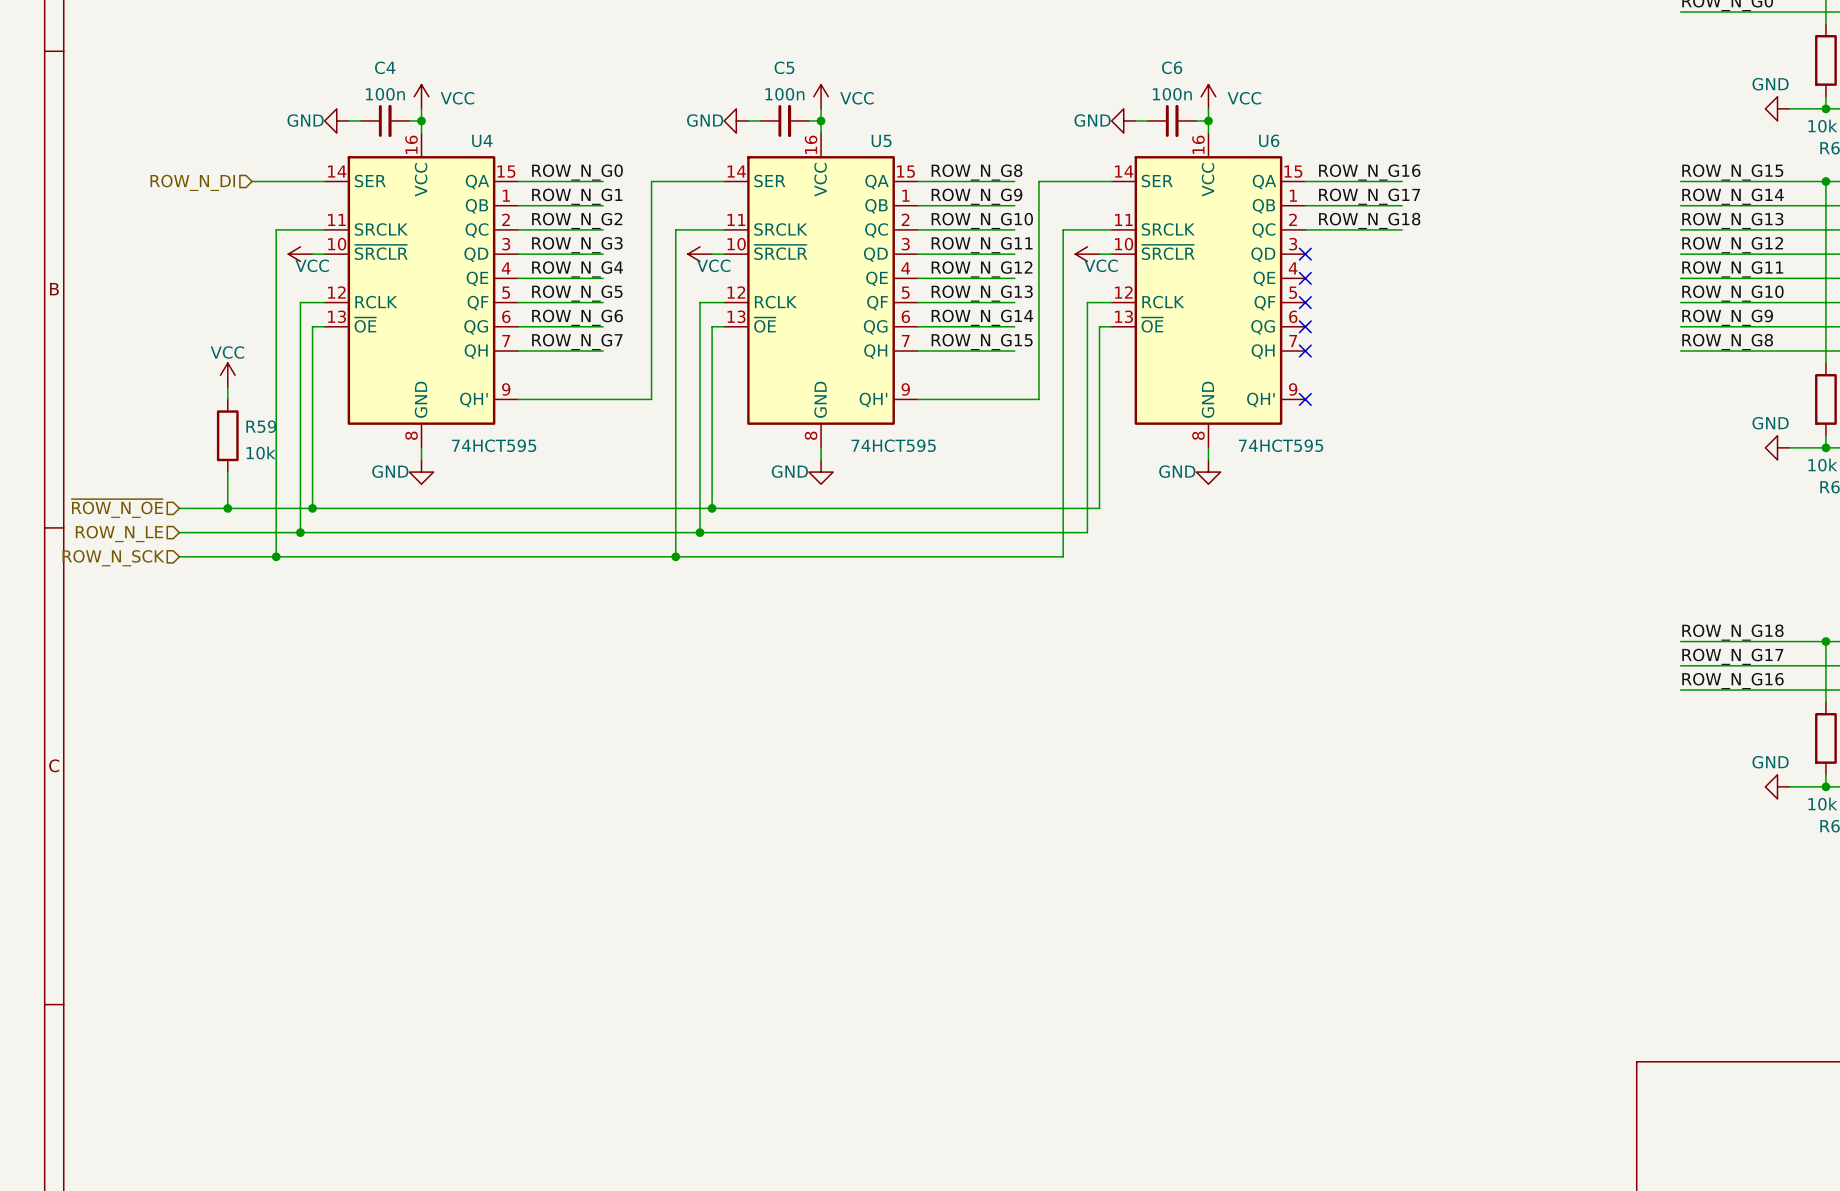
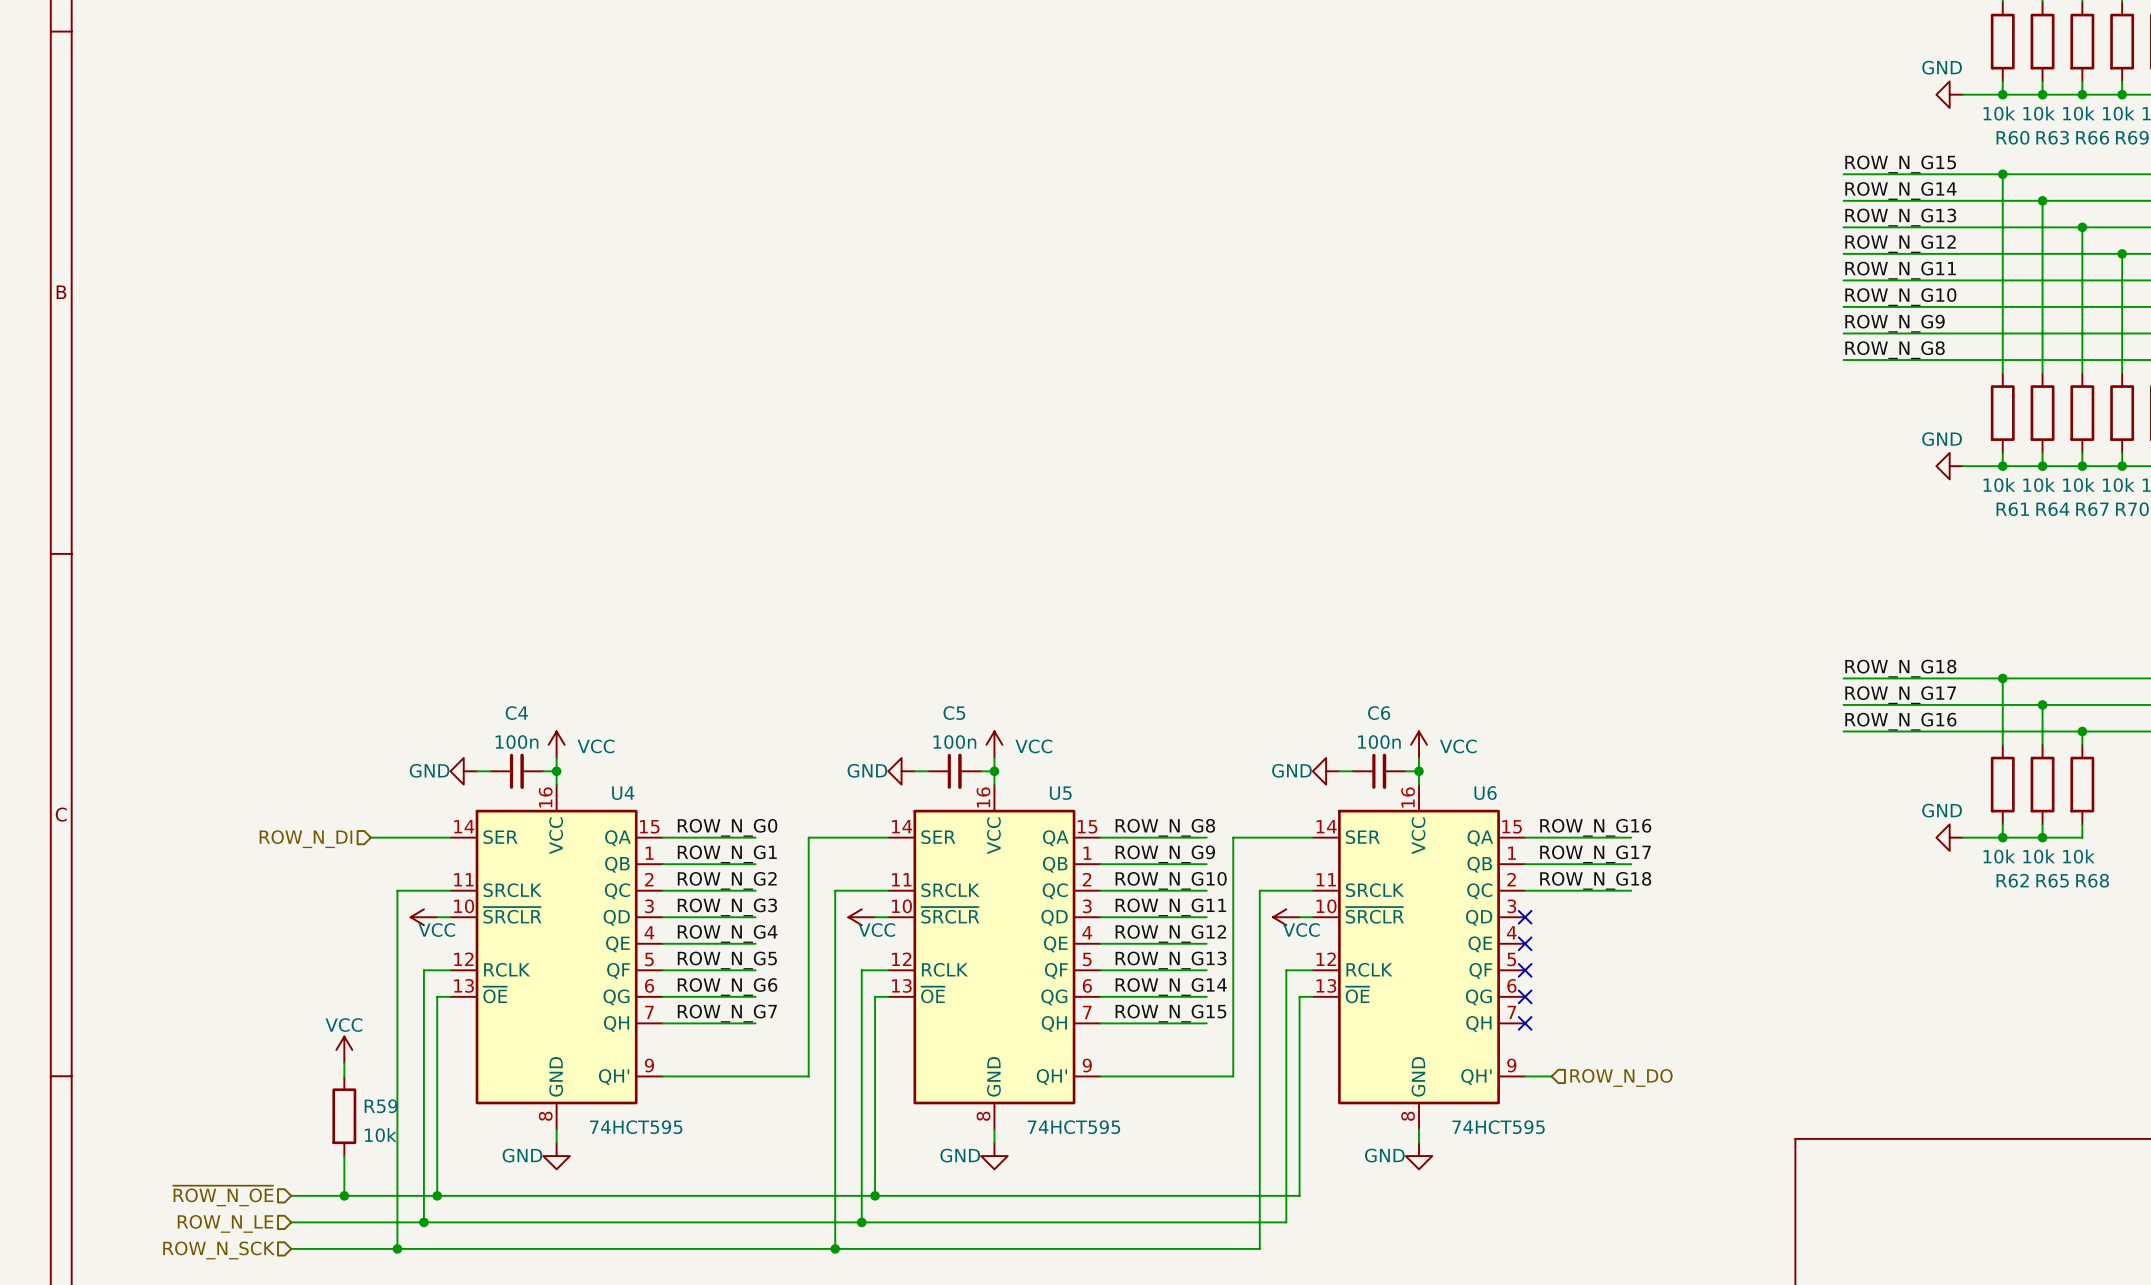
power symbol: VCC (421, 96) -> none
power symbol: VCC (821, 96) -> none
power symbol: VCC (1208, 96) -> none
wire: (421, 108) (421, 133) -> none
wire: (821, 108) (821, 133) -> none
wire: (1208, 108) (1208, 133) -> none
power symbol: GND (336, 120) -> none
wire: (348, 120) (360, 120) -> none
C4 position: (385, 120) -> (516, 771)
wire: (409, 120) (421, 120) -> none
junction: (421, 120) -> none
power symbol: GND (736, 120) -> none
wire: (748, 120) (760, 120) -> none
C5 position: (784, 120) -> (954, 771)
wire: (808, 120) (821, 120) -> none
junction: (821, 120) -> none
power symbol: GND (1123, 120) -> none
wire: (1135, 120) (1147, 120) -> none
C6 position: (1172, 120) -> (1379, 771)
wire: (1196, 120) (1208, 120) -> none
junction: (1208, 120) -> none
label: ROW_N_G0 (577, 172) -> none
label: ROW_N_G8 (977, 172) -> none
label: ROW_N_G16 (1369, 172) -> none
wire: (252, 181) (324, 181) -> none
wire: (518, 181) (603, 181) -> none
wire: (724, 181) (651, 181) (651, 399) (518, 399) -> none
wire: (917, 181) (1014, 181) -> none
wire: (1111, 181) (1038, 181) (1038, 399) (917, 399) -> none
wire: (1305, 181) (1402, 181) -> none
hierarchical label: ROW_N_DI (192, 182) -> none
label: ROW_N_G1 (577, 196) -> none
label: ROW_N_G9 (976, 196) -> none
label: ROW_N_G17 (1369, 196) -> none
wire: (518, 205) (603, 205) -> none
wire: (917, 205) (1014, 205) -> none
wire: (1305, 205) (1402, 205) -> none
label: ROW_N_G2 (577, 220) -> none
label: ROW_N_G10 (982, 220) -> none
label: ROW_N_G18 (1369, 220) -> none
wire: (324, 229) (276, 229) (276, 556) -> none
wire: (518, 229) (603, 229) -> none
wire: (724, 229) (675, 229) (675, 556) -> none
wire: (917, 229) (1014, 229) -> none
wire: (1111, 229) (1063, 229) (1063, 556) (179, 556) -> none
wire: (1305, 229) (1402, 229) -> none
label: ROW_N_G3 (577, 245) -> none
label: ROW_N_G11 (982, 245) -> none
power symbol: VCC (300, 254) -> none
wire: (312, 254) (324, 254) -> none
wire: (518, 254) (603, 254) -> none
power symbol: VCC (699, 254) -> none
wire: (712, 254) (724, 254) -> none
wire: (917, 254) (1014, 254) -> none
power symbol: VCC (1087, 254) -> none
wire: (1099, 254) (1111, 254) -> none
no-connect mark: (1305, 254) -> none
label: ROW_N_G4 (577, 269) -> none
label: ROW_N_G12 (982, 269) -> none
wire: (518, 278) (603, 278) -> none
wire: (917, 278) (1014, 278) -> none
no-connect mark: (1305, 278) -> none
U4 position: (421, 290) -> (556, 957)
U5 position: (821, 290) -> (994, 957)
U6 position: (1208, 290) -> (1418, 957)
label: ROW_N_G5 (577, 293) -> none
label: ROW_N_G13 (982, 293) -> none
wire: (324, 302) (300, 302) (300, 532) -> none
wire: (518, 302) (603, 302) -> none
wire: (724, 302) (699, 302) (699, 532) -> none
wire: (917, 302) (1014, 302) -> none
wire: (1111, 302) (1087, 302) (1087, 532) (179, 532) -> none
no-connect mark: (1305, 302) -> none
label: ROW_N_G6 (577, 317) -> none
label: ROW_N_G14 (982, 317) -> none
wire: (324, 326) (312, 326) (312, 508) -> none
wire: (518, 326) (603, 326) -> none
wire: (724, 326) (712, 326) (712, 508) -> none
wire: (917, 326) (1014, 326) -> none
wire: (1111, 326) (1099, 326) (1099, 508) (179, 508) -> none
no-connect mark: (1305, 326) -> none
label: ROW_N_G7 (577, 342) -> none
label: ROW_N_G15 (982, 342) -> none
wire: (518, 351) (603, 351) -> none
wire: (917, 351) (1014, 351) -> none
no-connect mark: (1305, 351) -> none
power symbol: VCC (227, 375) -> none
wire: (227, 387) (227, 399) -> none
no-connect mark: (1305, 399) -> none
R59 position: (227, 435) -> (344, 1116)
wire: (421, 447) (421, 459) -> none
wire: (821, 447) (821, 459) -> none
wire: (1208, 447) (1208, 459) -> none
wire: (227, 472) (227, 508) -> none
power symbol: GND (421, 472) -> none
power symbol: GND (821, 472) -> none
power symbol: GND (1208, 472) -> none
hierarchical label: ~{ROW_N_OE} (117, 508) -> none
junction: (227, 508) -> none
junction: (312, 508) -> none
junction: (712, 508) -> none
junction: (300, 532) -> none
junction: (699, 532) -> none
hierarchical label: ROW_N_LE (119, 534) -> none
junction: (276, 556) -> none
junction: (675, 556) -> none
hierarchical label: ROW_N_SCK (113, 558) -> none
power symbol: none -> VCC (556, 744)
power symbol: none -> VCC (994, 744)
power symbol: none -> VCC (1418, 744)
wire: none -> (556, 758) (556, 784)
wire: none -> (994, 758) (994, 784)
wire: none -> (1418, 758) (1418, 784)
power symbol: none -> GND (463, 771)
wire: none -> (477, 771) (490, 771)
wire: none -> (543, 771) (556, 771)
junction: none -> (556, 771)
power symbol: none -> GND (901, 771)
wire: none -> (914, 771) (928, 771)
wire: none -> (981, 771) (994, 771)
junction: none -> (994, 771)
power symbol: none -> GND (1326, 771)
wire: none -> (1339, 771) (1352, 771)
wire: none -> (1405, 771) (1418, 771)
junction: none -> (1418, 771)
label: none -> ROW_N_G0 (727, 827)
label: none -> ROW_N_G8 (1165, 827)
label: none -> ROW_N_G16 (1595, 827)
wire: none -> (370, 837) (450, 837)
wire: none -> (662, 837) (755, 837)
wire: none -> (888, 837) (808, 837) (808, 1076) (662, 1076)
wire: none -> (1100, 837) (1206, 837)
wire: none -> (1312, 837) (1233, 837) (1233, 1076) (1100, 1076)
wire: none -> (1525, 837) (1631, 837)
hierarchical label: none -> ROW_N_DI (305, 839)
label: none -> ROW_N_G1 (727, 854)
label: none -> ROW_N_G9 (1165, 854)
label: none -> ROW_N_G17 (1595, 854)
wire: none -> (662, 864) (755, 864)
wire: none -> (1100, 864) (1206, 864)
wire: none -> (1525, 864) (1631, 864)
label: none -> ROW_N_G2 (727, 880)
label: none -> ROW_N_G10 (1171, 880)
label: none -> ROW_N_G18 (1595, 880)
wire: none -> (450, 890) (397, 890) (397, 1248)
wire: none -> (662, 890) (755, 890)
wire: none -> (888, 890) (835, 890) (835, 1248)
wire: none -> (1100, 890) (1206, 890)
wire: none -> (1312, 890) (1259, 890) (1259, 1248) (291, 1248)
wire: none -> (1525, 890) (1631, 890)
label: none -> ROW_N_G3 (727, 907)
label: none -> ROW_N_G11 (1170, 907)
power symbol: none -> VCC (423, 917)
wire: none -> (437, 917) (450, 917)
wire: none -> (662, 917) (755, 917)
power symbol: none -> VCC (861, 917)
wire: none -> (875, 917) (888, 917)
wire: none -> (1100, 917) (1206, 917)
power symbol: none -> VCC (1286, 917)
wire: none -> (1299, 917) (1312, 917)
no-connect mark: none -> (1525, 917)
label: none -> ROW_N_G4 (727, 933)
label: none -> ROW_N_G12 (1170, 933)
wire: none -> (662, 943) (755, 943)
wire: none -> (1100, 943) (1206, 943)
no-connect mark: none -> (1525, 943)
label: none -> ROW_N_G5 (727, 960)
label: none -> ROW_N_G13 (1171, 960)
wire: none -> (450, 970) (423, 970) (423, 1222)
wire: none -> (662, 970) (755, 970)
wire: none -> (888, 970) (861, 970) (861, 1222)
wire: none -> (1100, 970) (1206, 970)
wire: none -> (1312, 970) (1286, 970) (1286, 1222) (291, 1222)
no-connect mark: none -> (1525, 970)
label: none -> ROW_N_G6 (727, 987)
label: none -> ROW_N_G14 (1171, 987)
wire: none -> (450, 996) (437, 996) (437, 1195)
wire: none -> (662, 996) (755, 996)
wire: none -> (888, 996) (875, 996) (875, 1195)
wire: none -> (1100, 996) (1206, 996)
wire: none -> (1312, 996) (1299, 996) (1299, 1195) (291, 1195)
no-connect mark: none -> (1525, 996)
label: none -> ROW_N_G7 (727, 1013)
label: none -> ROW_N_G15 (1170, 1013)
wire: none -> (662, 1023) (755, 1023)
wire: none -> (1100, 1023) (1206, 1023)
no-connect mark: none -> (1525, 1023)
power symbol: none -> VCC (344, 1049)
wire: none -> (344, 1063) (344, 1076)
wire: none -> (1525, 1076) (1551, 1076)
hierarchical label: none -> ROW_N_DO (1621, 1077)
wire: none -> (556, 1129) (556, 1142)
wire: none -> (994, 1129) (994, 1142)
wire: none -> (1418, 1129) (1418, 1142)
wire: none -> (344, 1156) (344, 1195)
power symbol: none -> GND (556, 1156)
power symbol: none -> GND (994, 1156)
power symbol: none -> GND (1418, 1156)
hierarchical label: none -> ~{ROW_N_OE} (223, 1195)
junction: none -> (344, 1195)
junction: none -> (437, 1195)
junction: none -> (875, 1195)
junction: none -> (423, 1222)
junction: none -> (861, 1222)
hierarchical label: none -> ROW_N_LE (225, 1223)
junction: none -> (397, 1248)
junction: none -> (835, 1248)
hierarchical label: none -> ROW_N_SCK (219, 1250)

